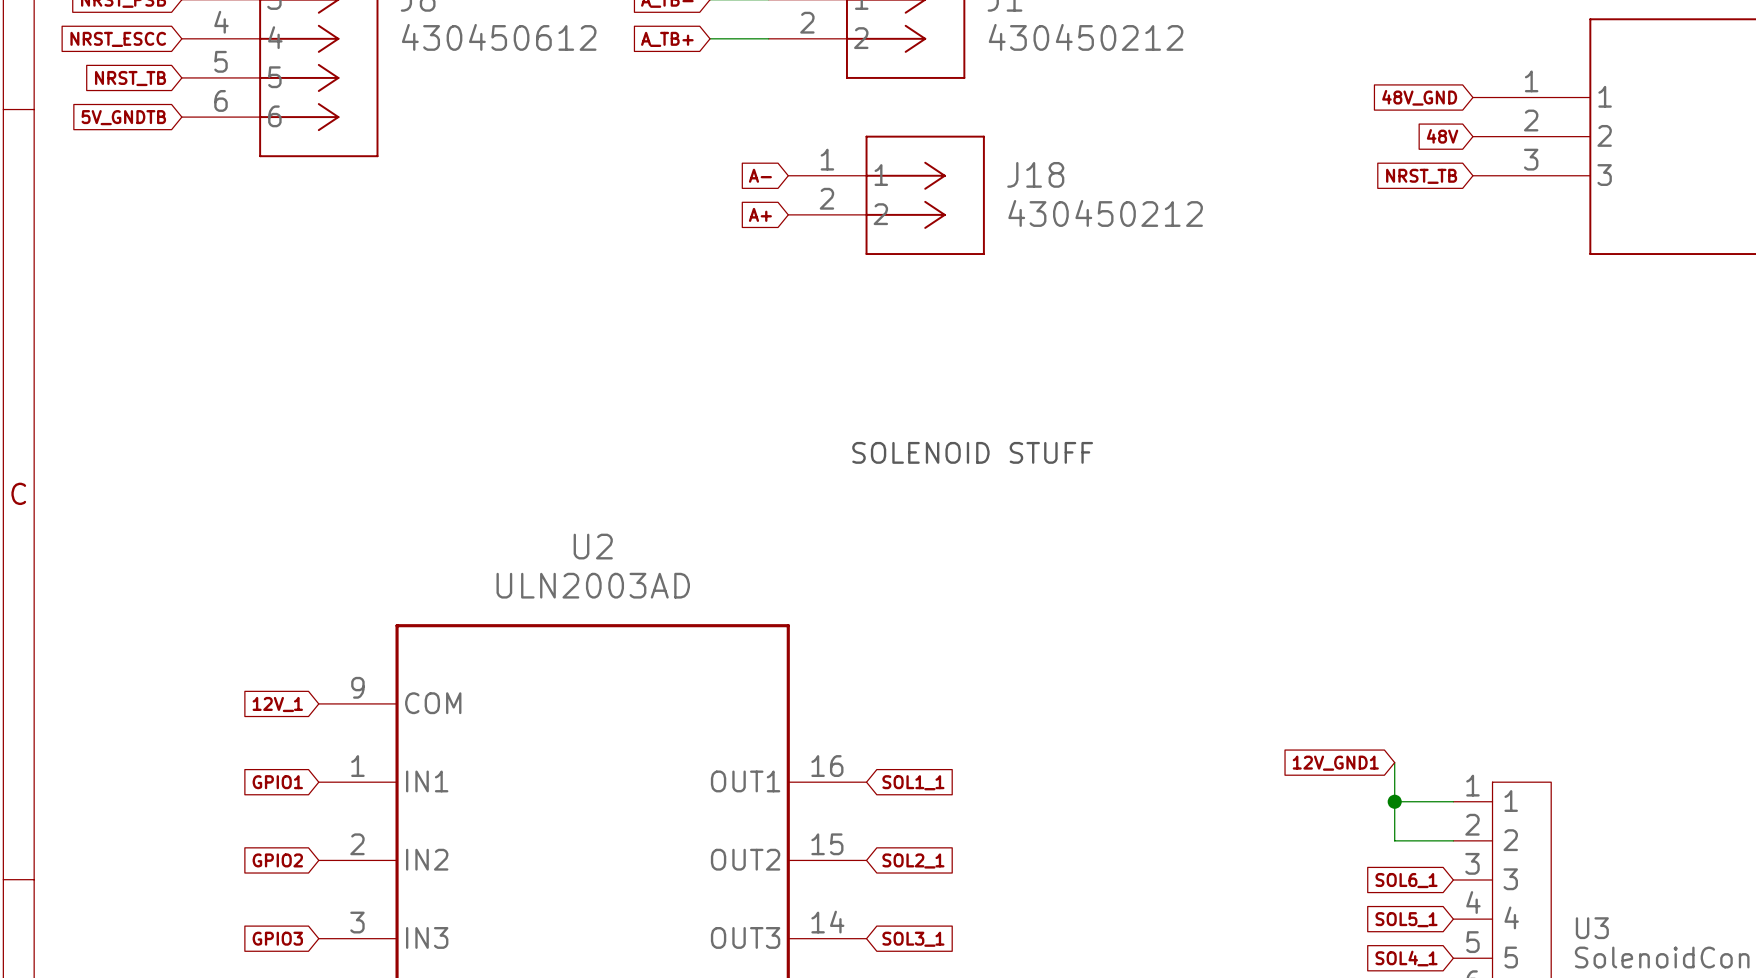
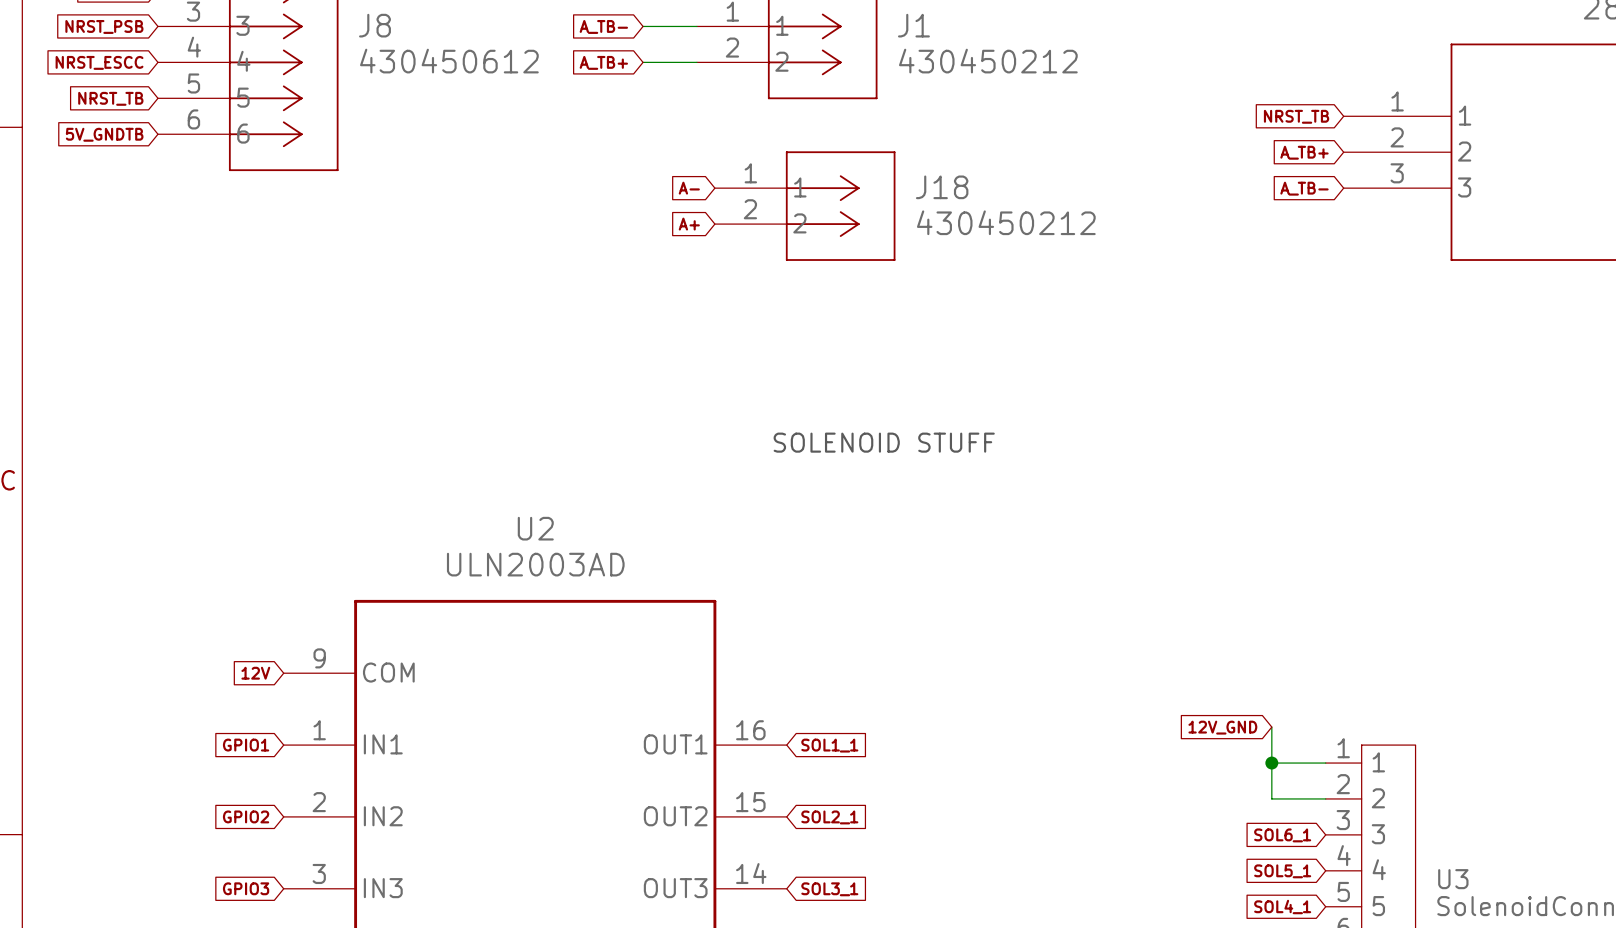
global label: 48V_GND (1419, 97) -> NRST_TB (1296, 116)
global label: 48V (1442, 136) -> A_TB+ (1304, 152)
global label: NRST_TB (1421, 176) -> A_TB- (1304, 188)
global label: 12V_1 (277, 704) -> 12V (255, 673)
global label: 12V_GND1 (1335, 763) -> 12V_GND (1222, 727)

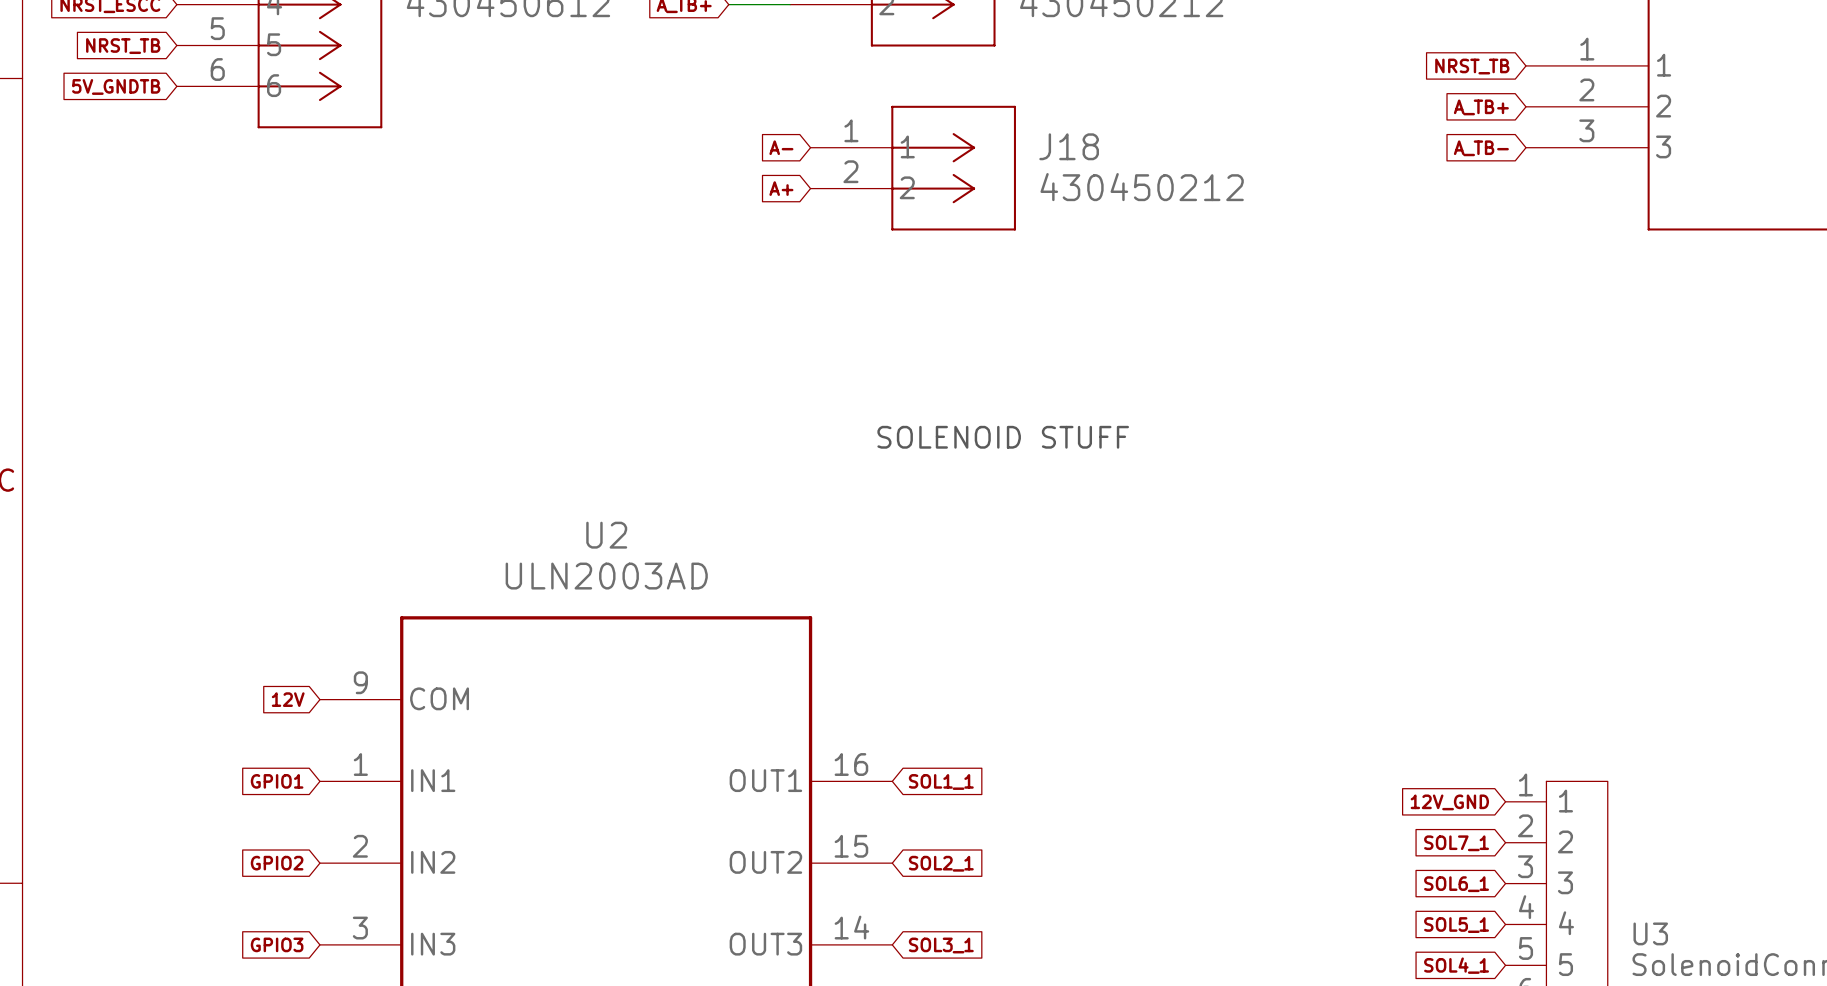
global label position: 12V_GND (1222, 727) -> 12V_GND (1449, 802)
wire: (1271, 727) (1271, 798) (1325, 798) -> none
wire: (1271, 763) (1325, 763) -> none
junction: (1271, 763) -> none
global label: none -> SOL7_1 (1456, 843)

